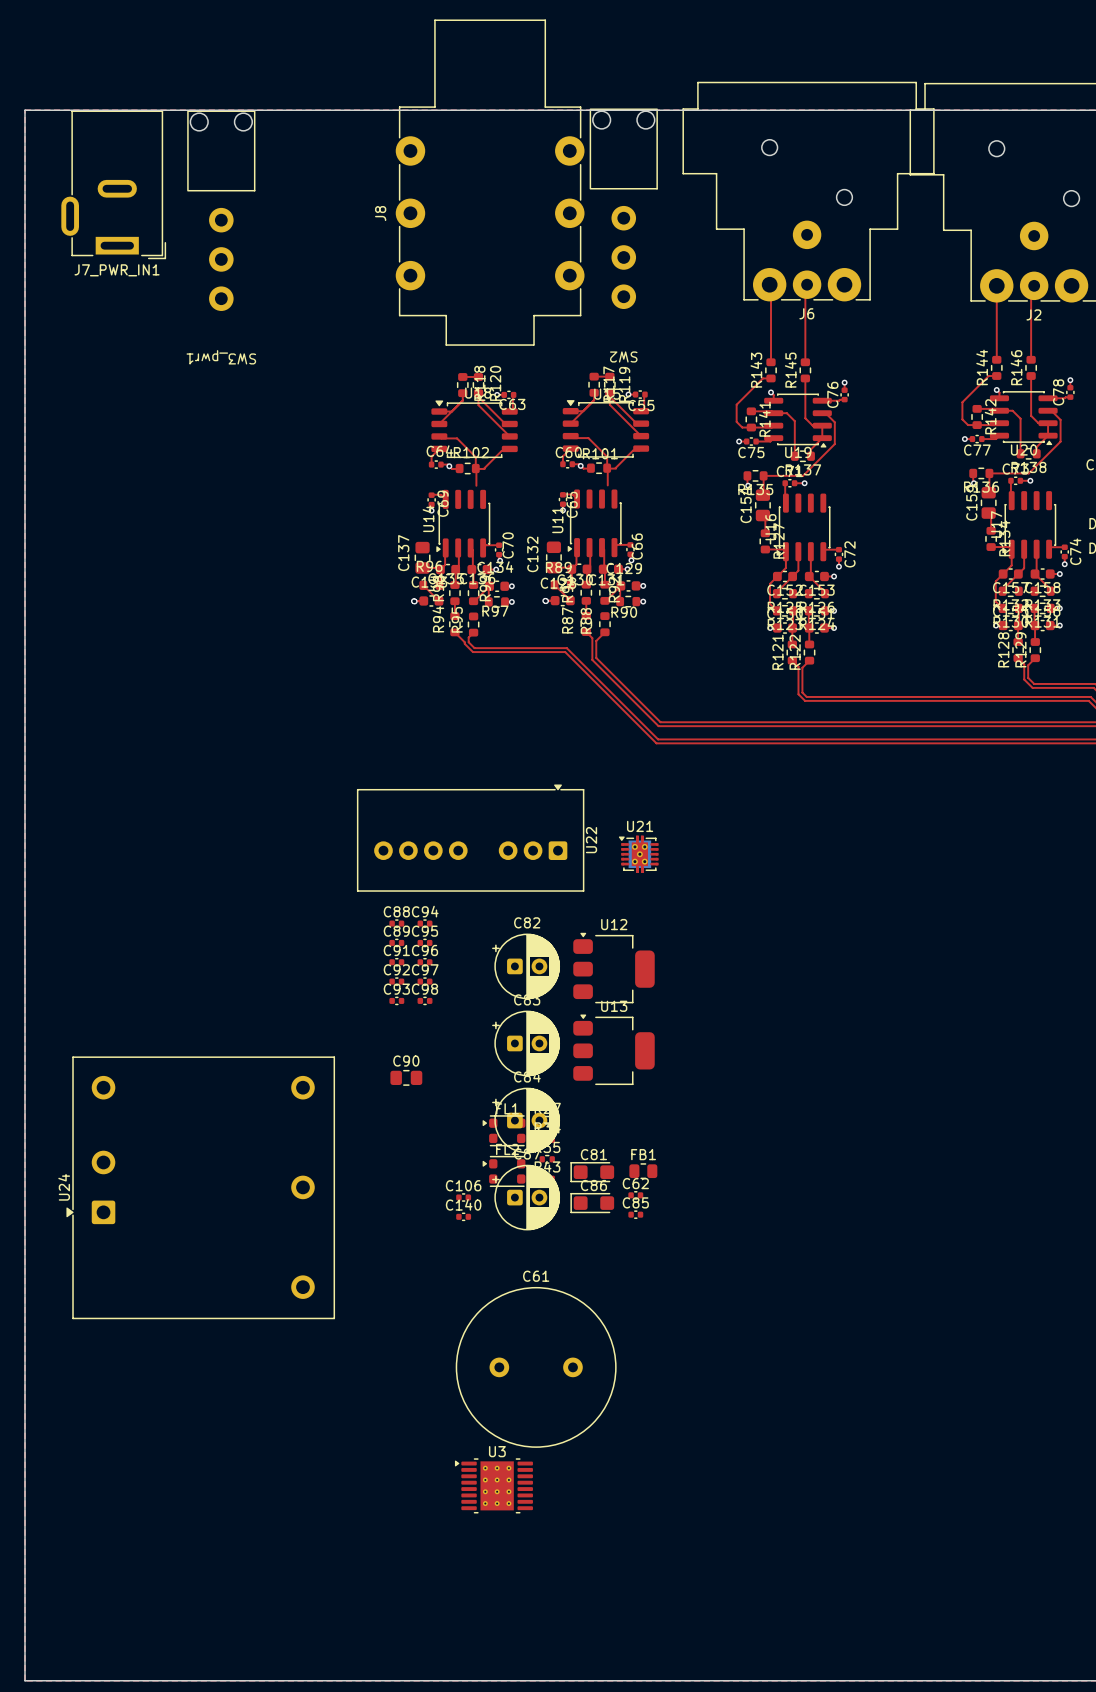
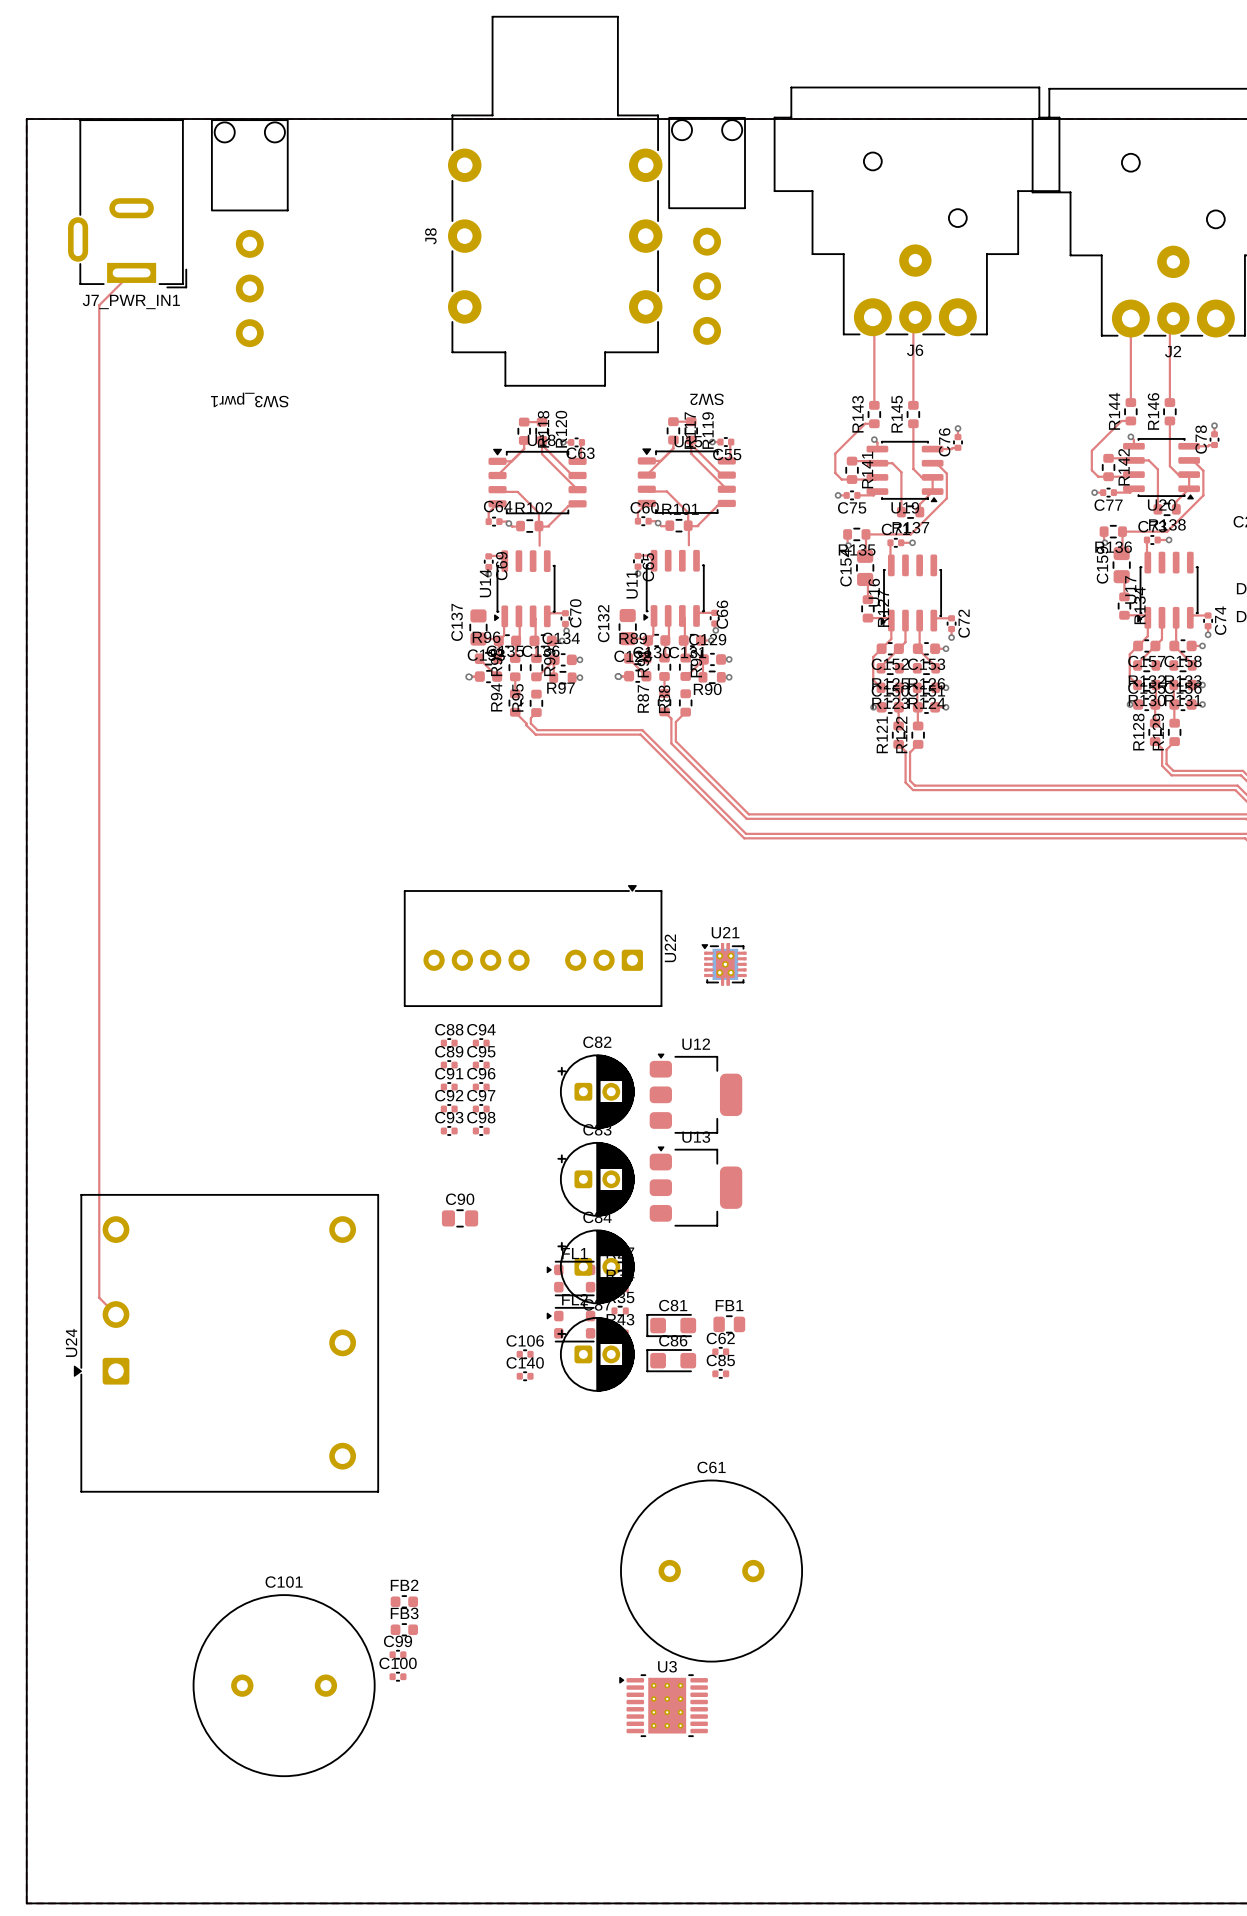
top track: none -> (131, 272) (99, 305) (99, 1297) (115, 1314)
C61 position: (536, 1367) -> (711, 1571)
FB2: none -> (404, 1601)
FB3: none -> (404, 1629)
C99: none -> (397, 1654)
C100: none -> (397, 1676)
U3 position: (493, 1485) -> (663, 1705)
C101: none -> (284, 1685)

